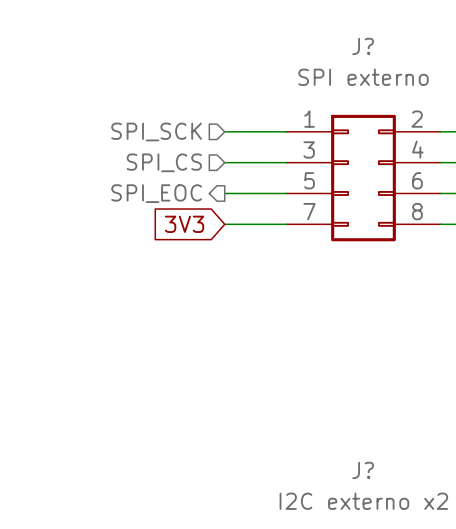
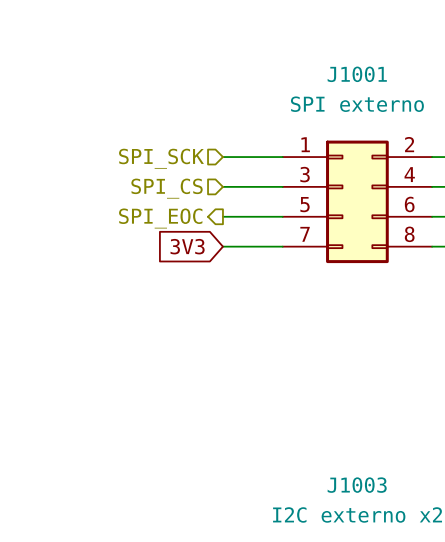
J? name: J? (363, 46) -> J1001 (357, 74)
J? name: J? (363, 470) -> J1003 (357, 485)

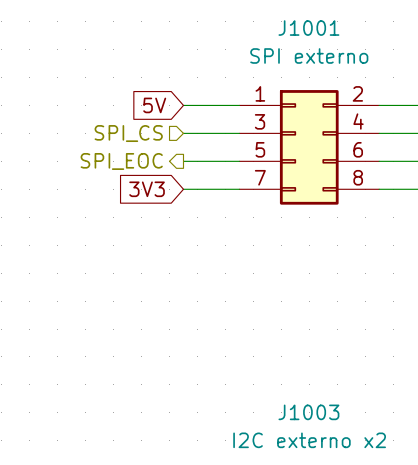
global label: none -> 5V (154, 105)
hierarchical label: SPI_SCK (161, 158) -> none

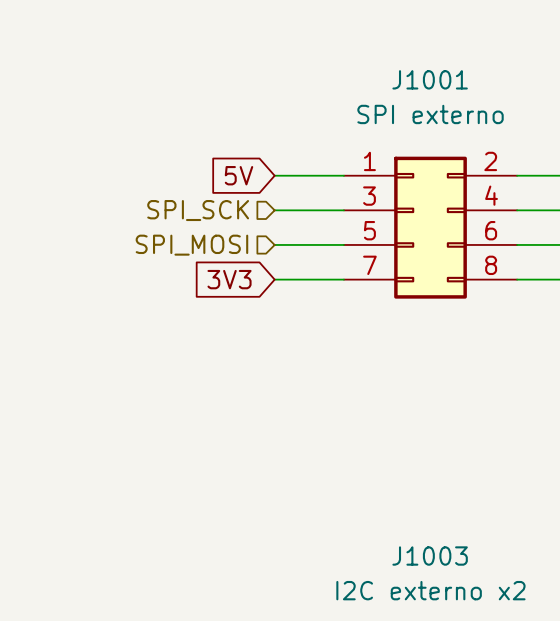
hierarchical label: SPI_CS (128, 133) -> SPI_SCK (198, 210)
hierarchical label shape: output (121, 161) -> input (191, 245)
hierarchical label: SPI_EOC (121, 161) -> SPI_MOSI (191, 245)

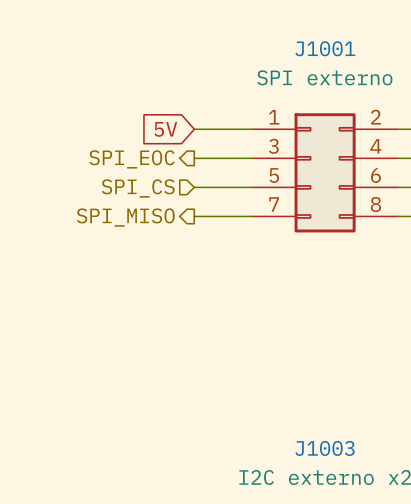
hierarchical label shape: input (198, 210) -> output (131, 159)
hierarchical label: SPI_SCK (198, 210) -> SPI_EOC (131, 159)
hierarchical label: SPI_MOSI (191, 245) -> SPI_CS (138, 188)
hierarchical label: none -> SPI_MISO (125, 217)
global label: 3V3 (229, 279) -> none

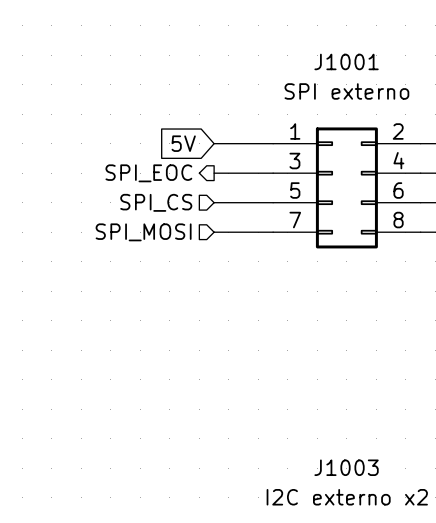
hierarchical label shape: output (125, 217) -> input (143, 232)
hierarchical label: SPI_MISO (125, 217) -> SPI_MOSI (143, 232)

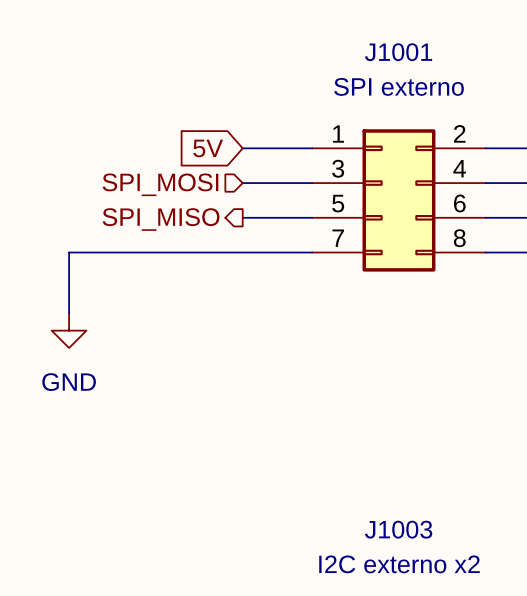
hierarchical label shape: output (148, 173) -> input (160, 184)
hierarchical label: SPI_EOC (148, 173) -> SPI_MOSI (160, 184)
hierarchical label shape: input (156, 202) -> output (161, 219)
hierarchical label: SPI_CS (156, 202) -> SPI_MISO (161, 219)
hierarchical label: SPI_MOSI (143, 232) -> none
wire: none -> (242, 252) (69, 252) (69, 313)
power symbol: none -> GND (69, 330)

